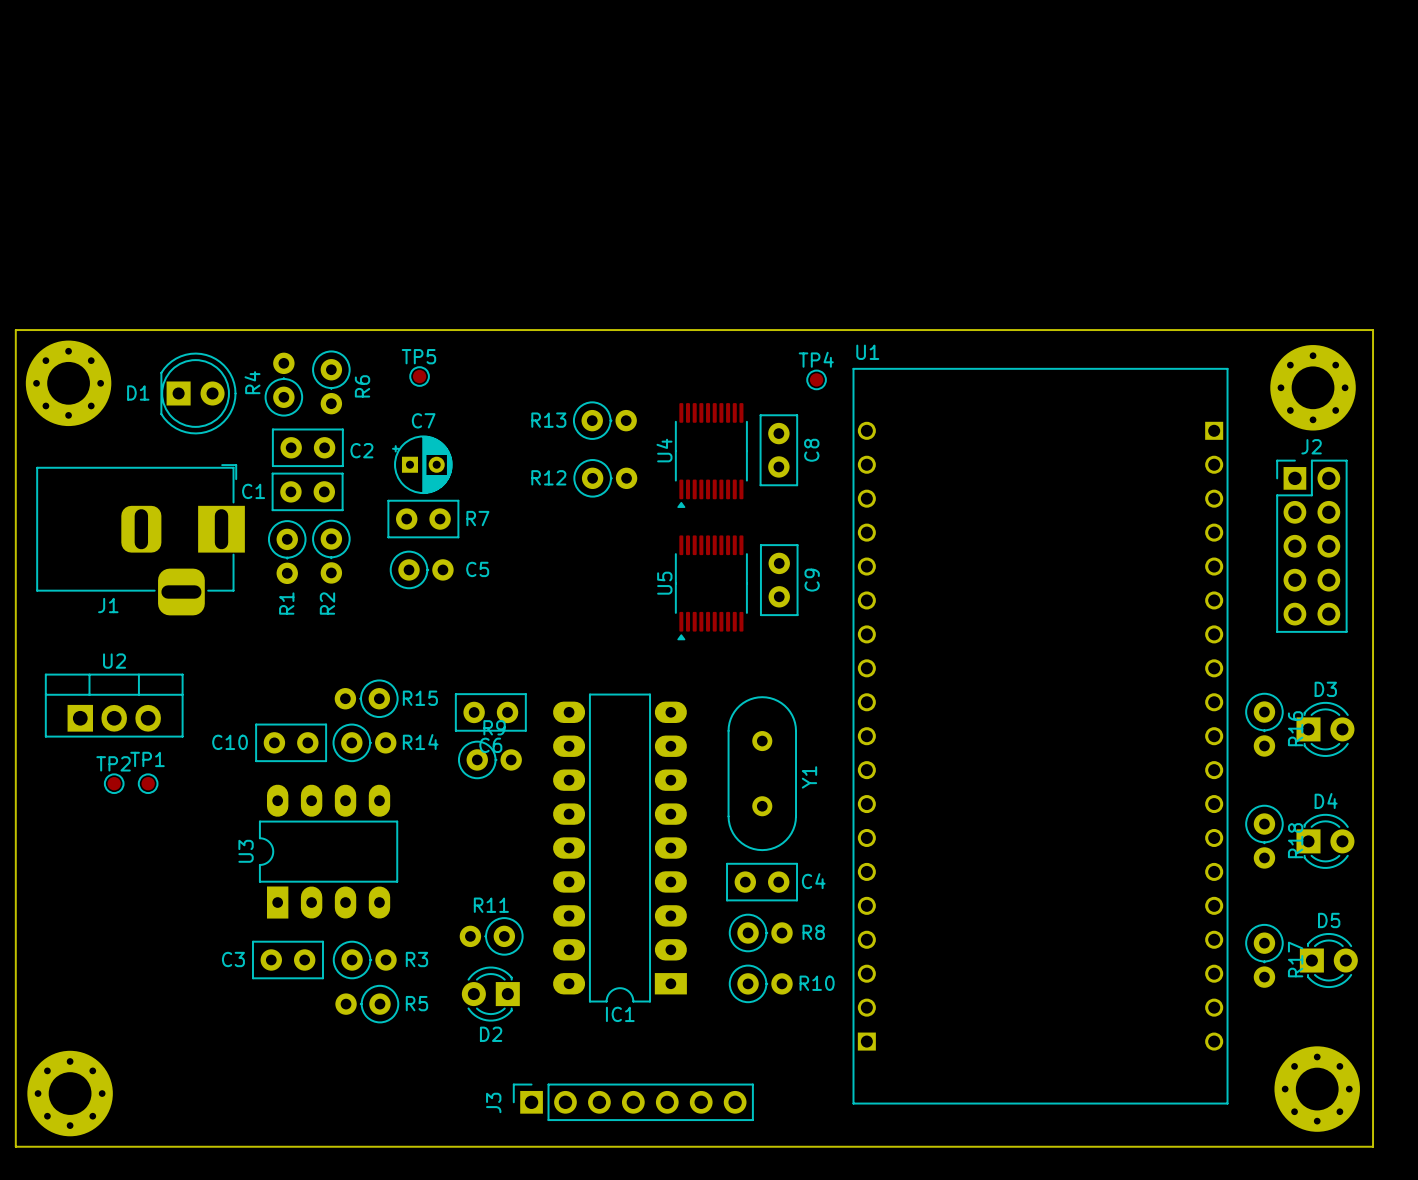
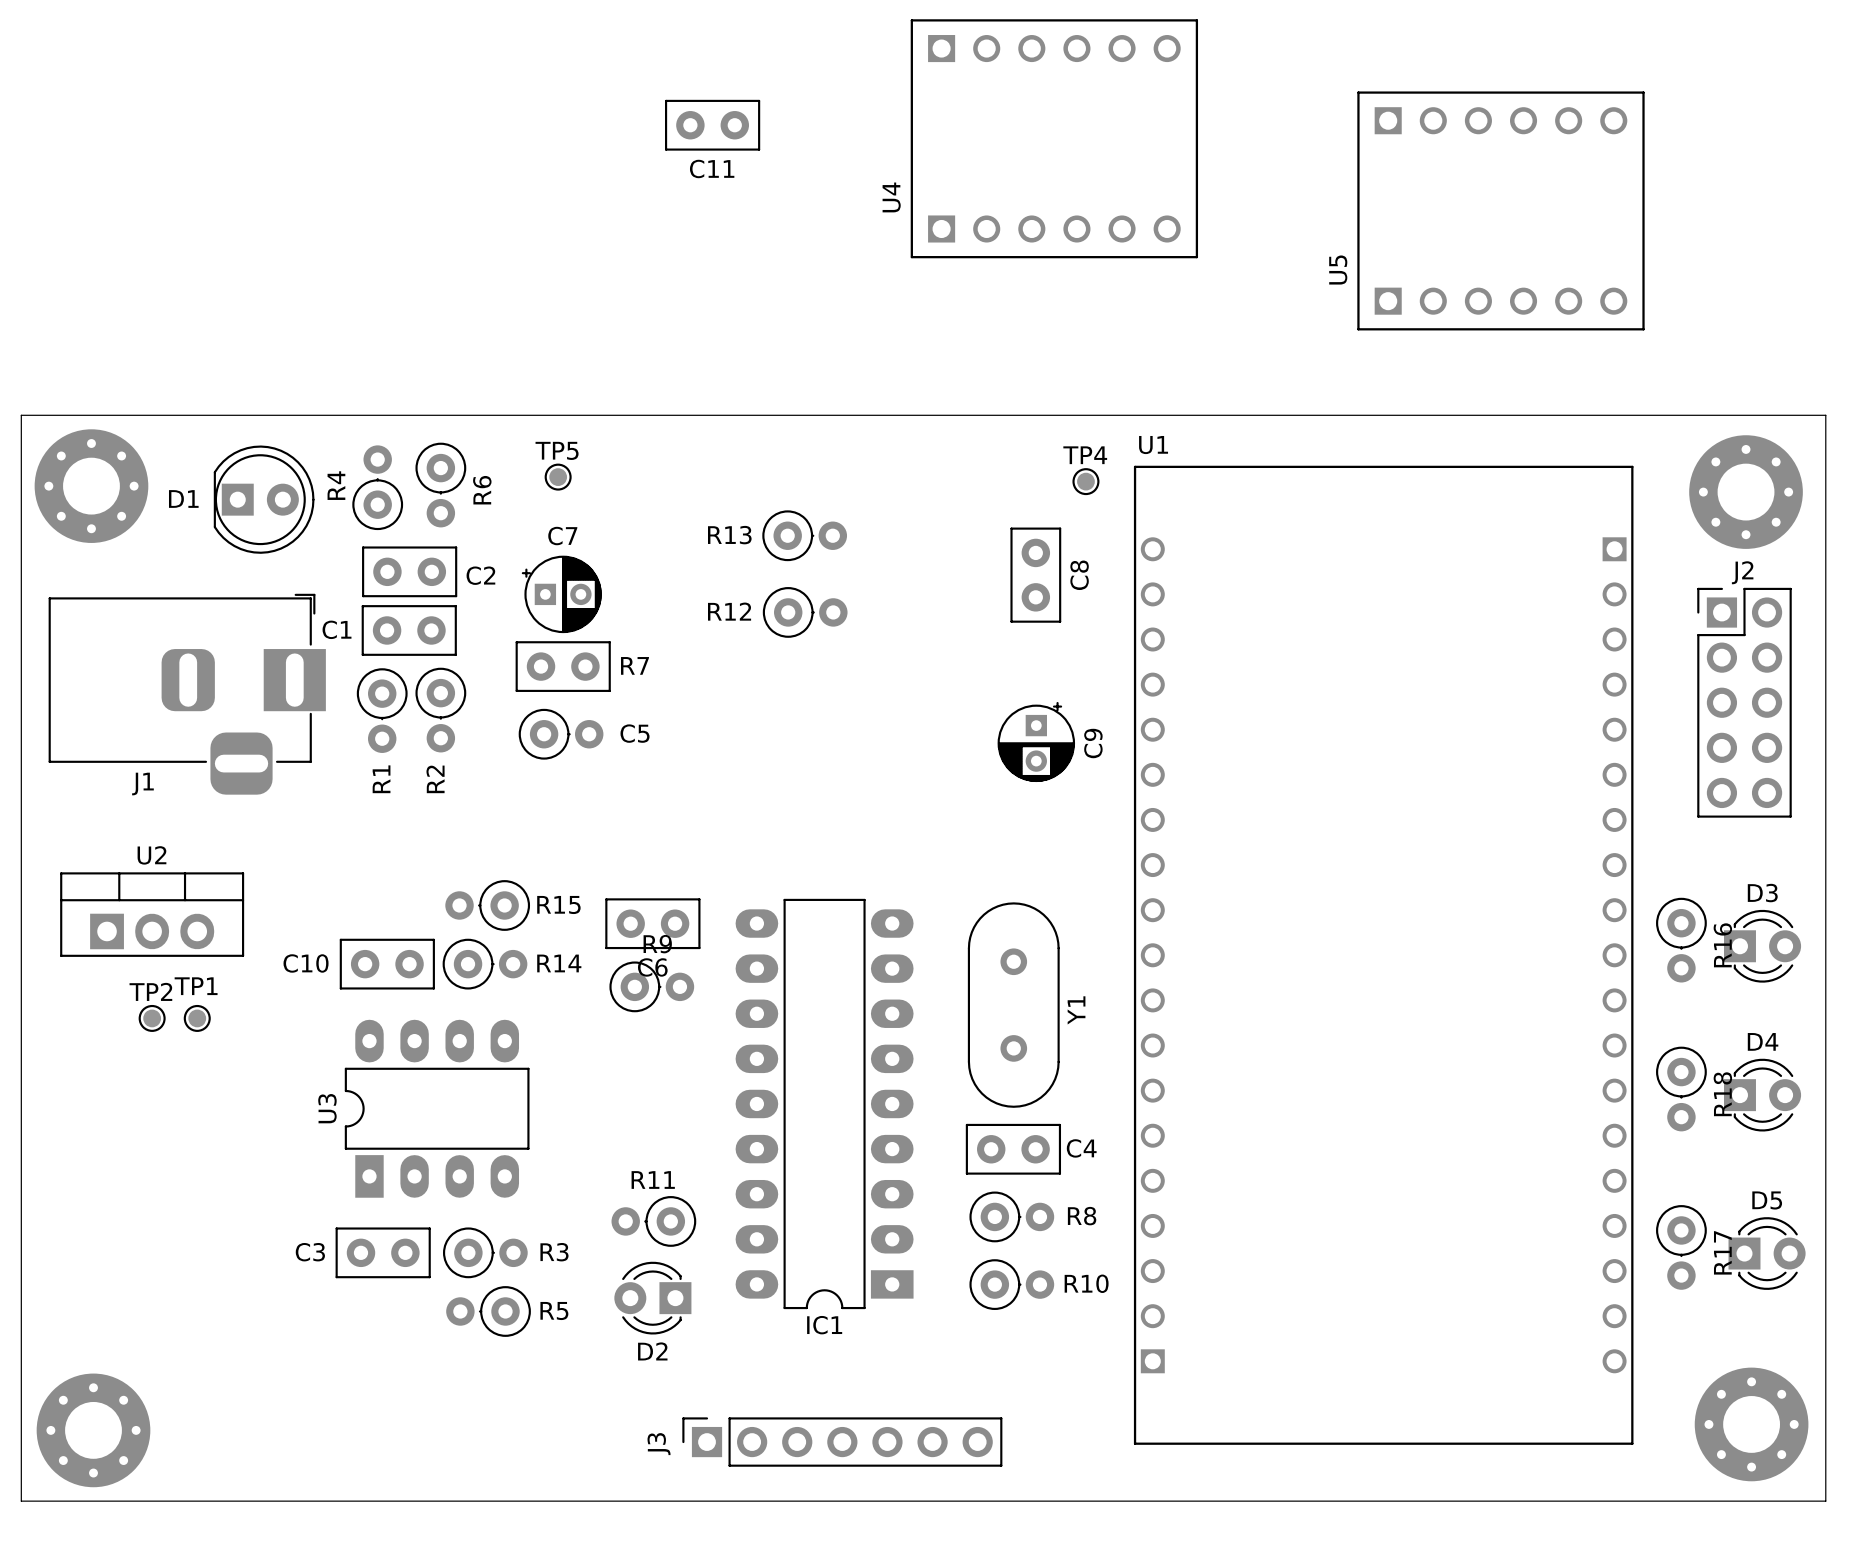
C11: none -> (712, 125)
U4 footprint: [675, 403, 748, 508] -> [910, 19, 1199, 259]
U4 name position: U4 (664, 450) -> U4 (891, 197)
U5 footprint: [675, 535, 748, 641] -> [1357, 91, 1645, 331]
C9 footprint: [760, 544, 799, 616] -> [997, 701, 1076, 783]
U5 name position: U5 (664, 583) -> U5 (1338, 270)

